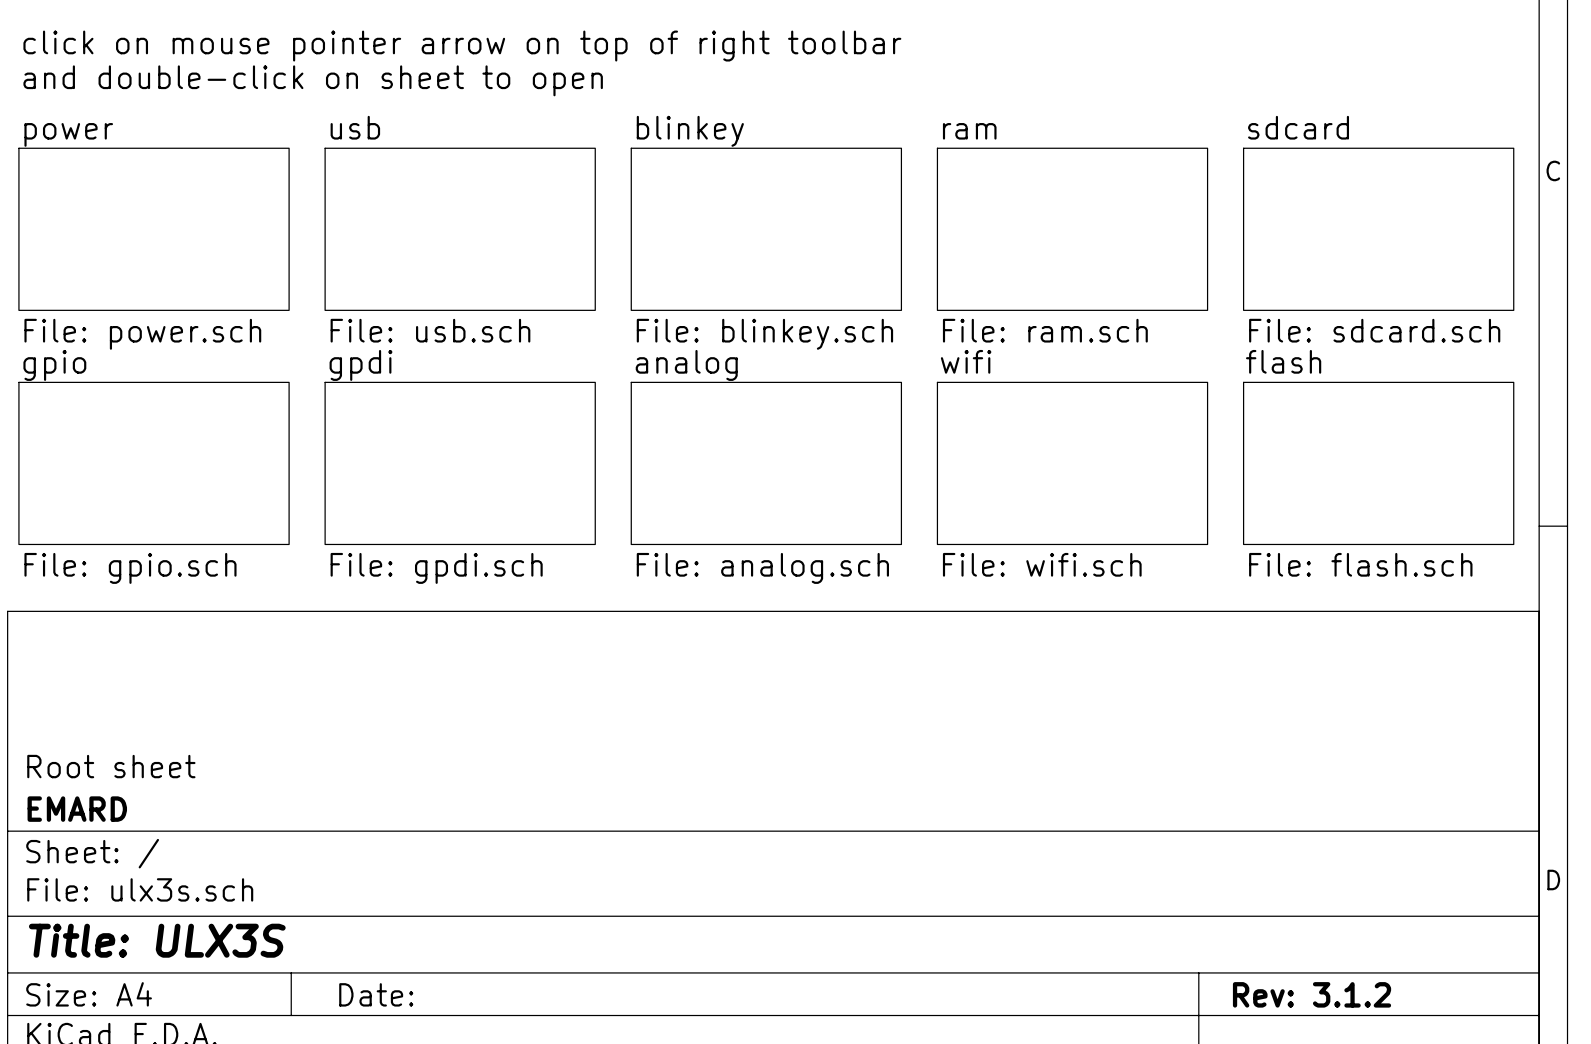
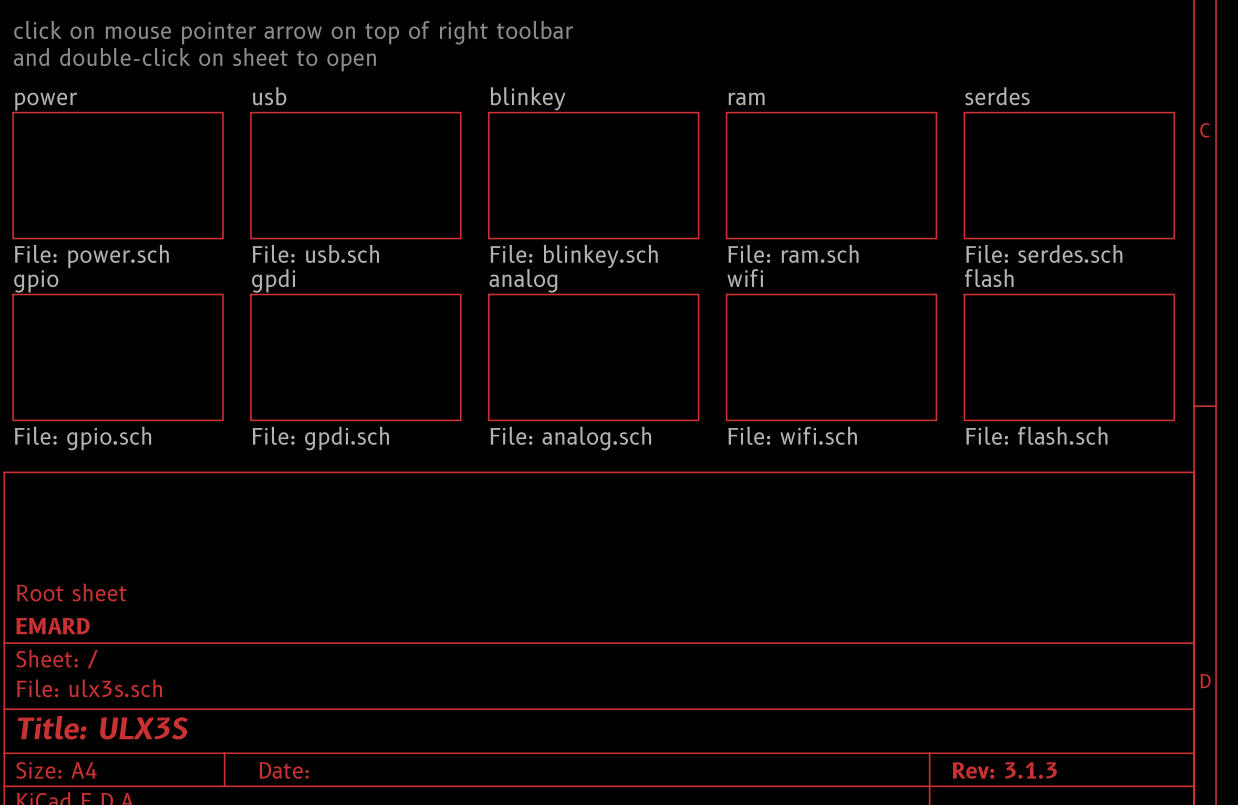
sheet sdcard name: sdcard (1298, 127) -> serdes (997, 96)
sheet sdcard value: File: sdcard.sch (1374, 330) -> File: serdes.sch (1044, 253)
title block: Rev: 3.1.2 (1312, 994) -> Rev: 3.1.3 (1004, 770)

